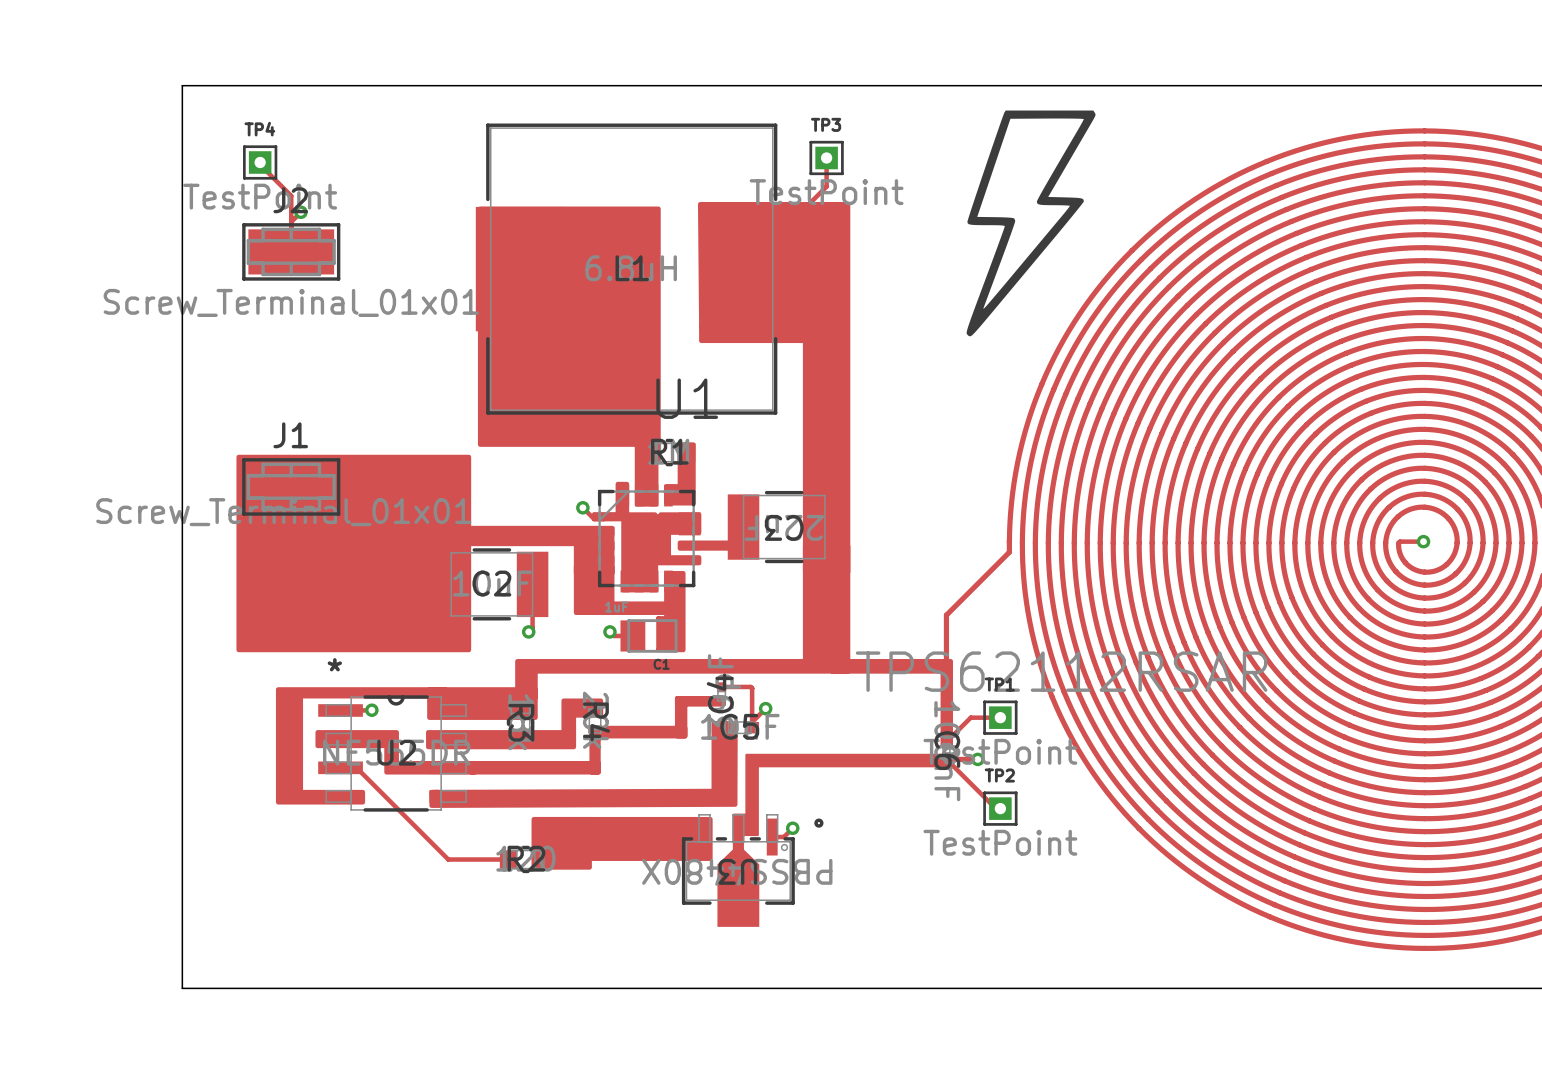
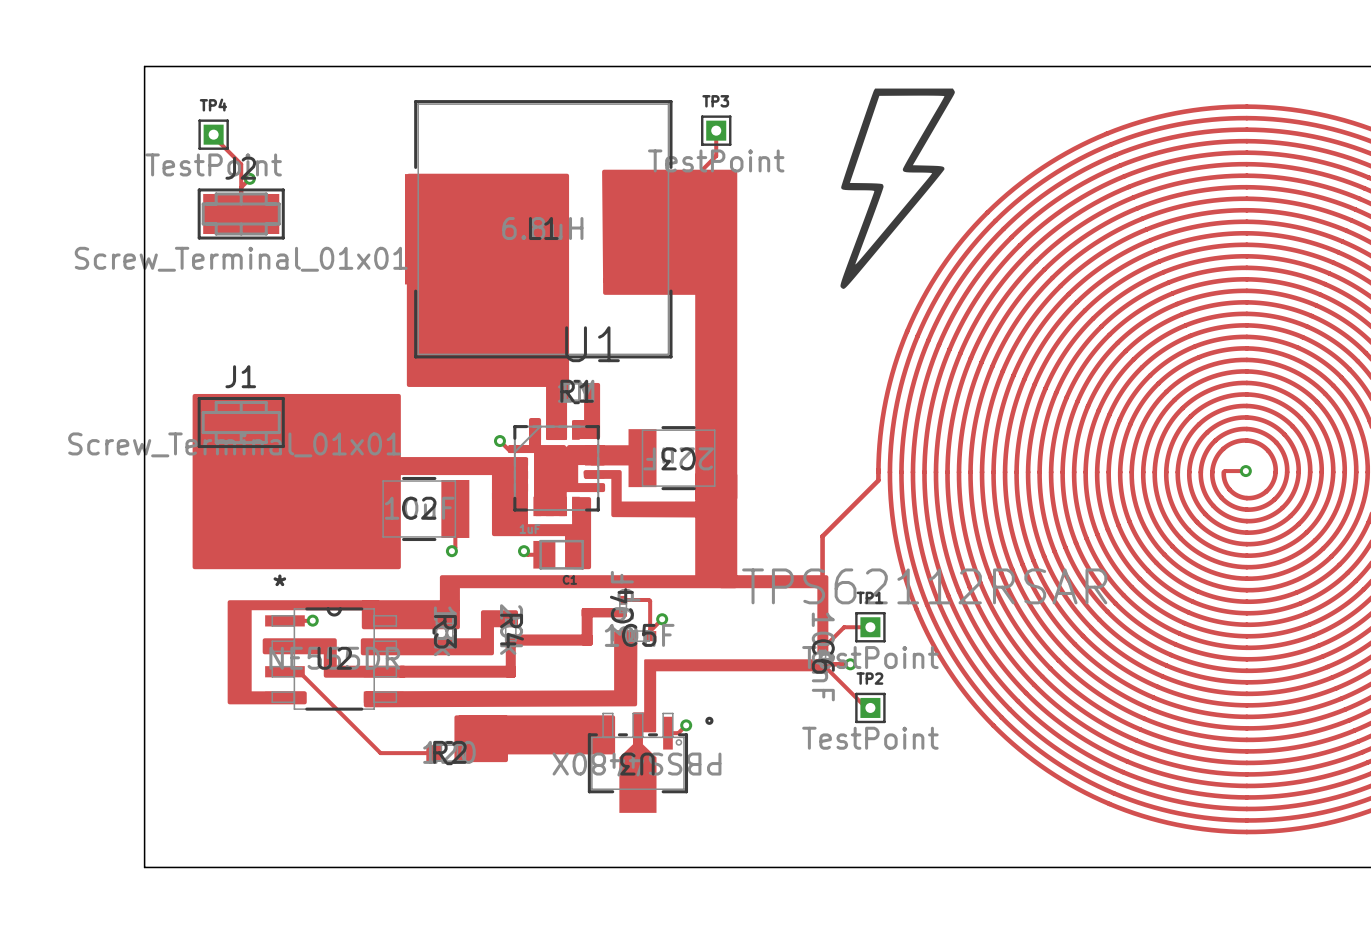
drawing: none -> [565, 445, 705, 545]
drawing: [677, 540, 732, 551] -> none

